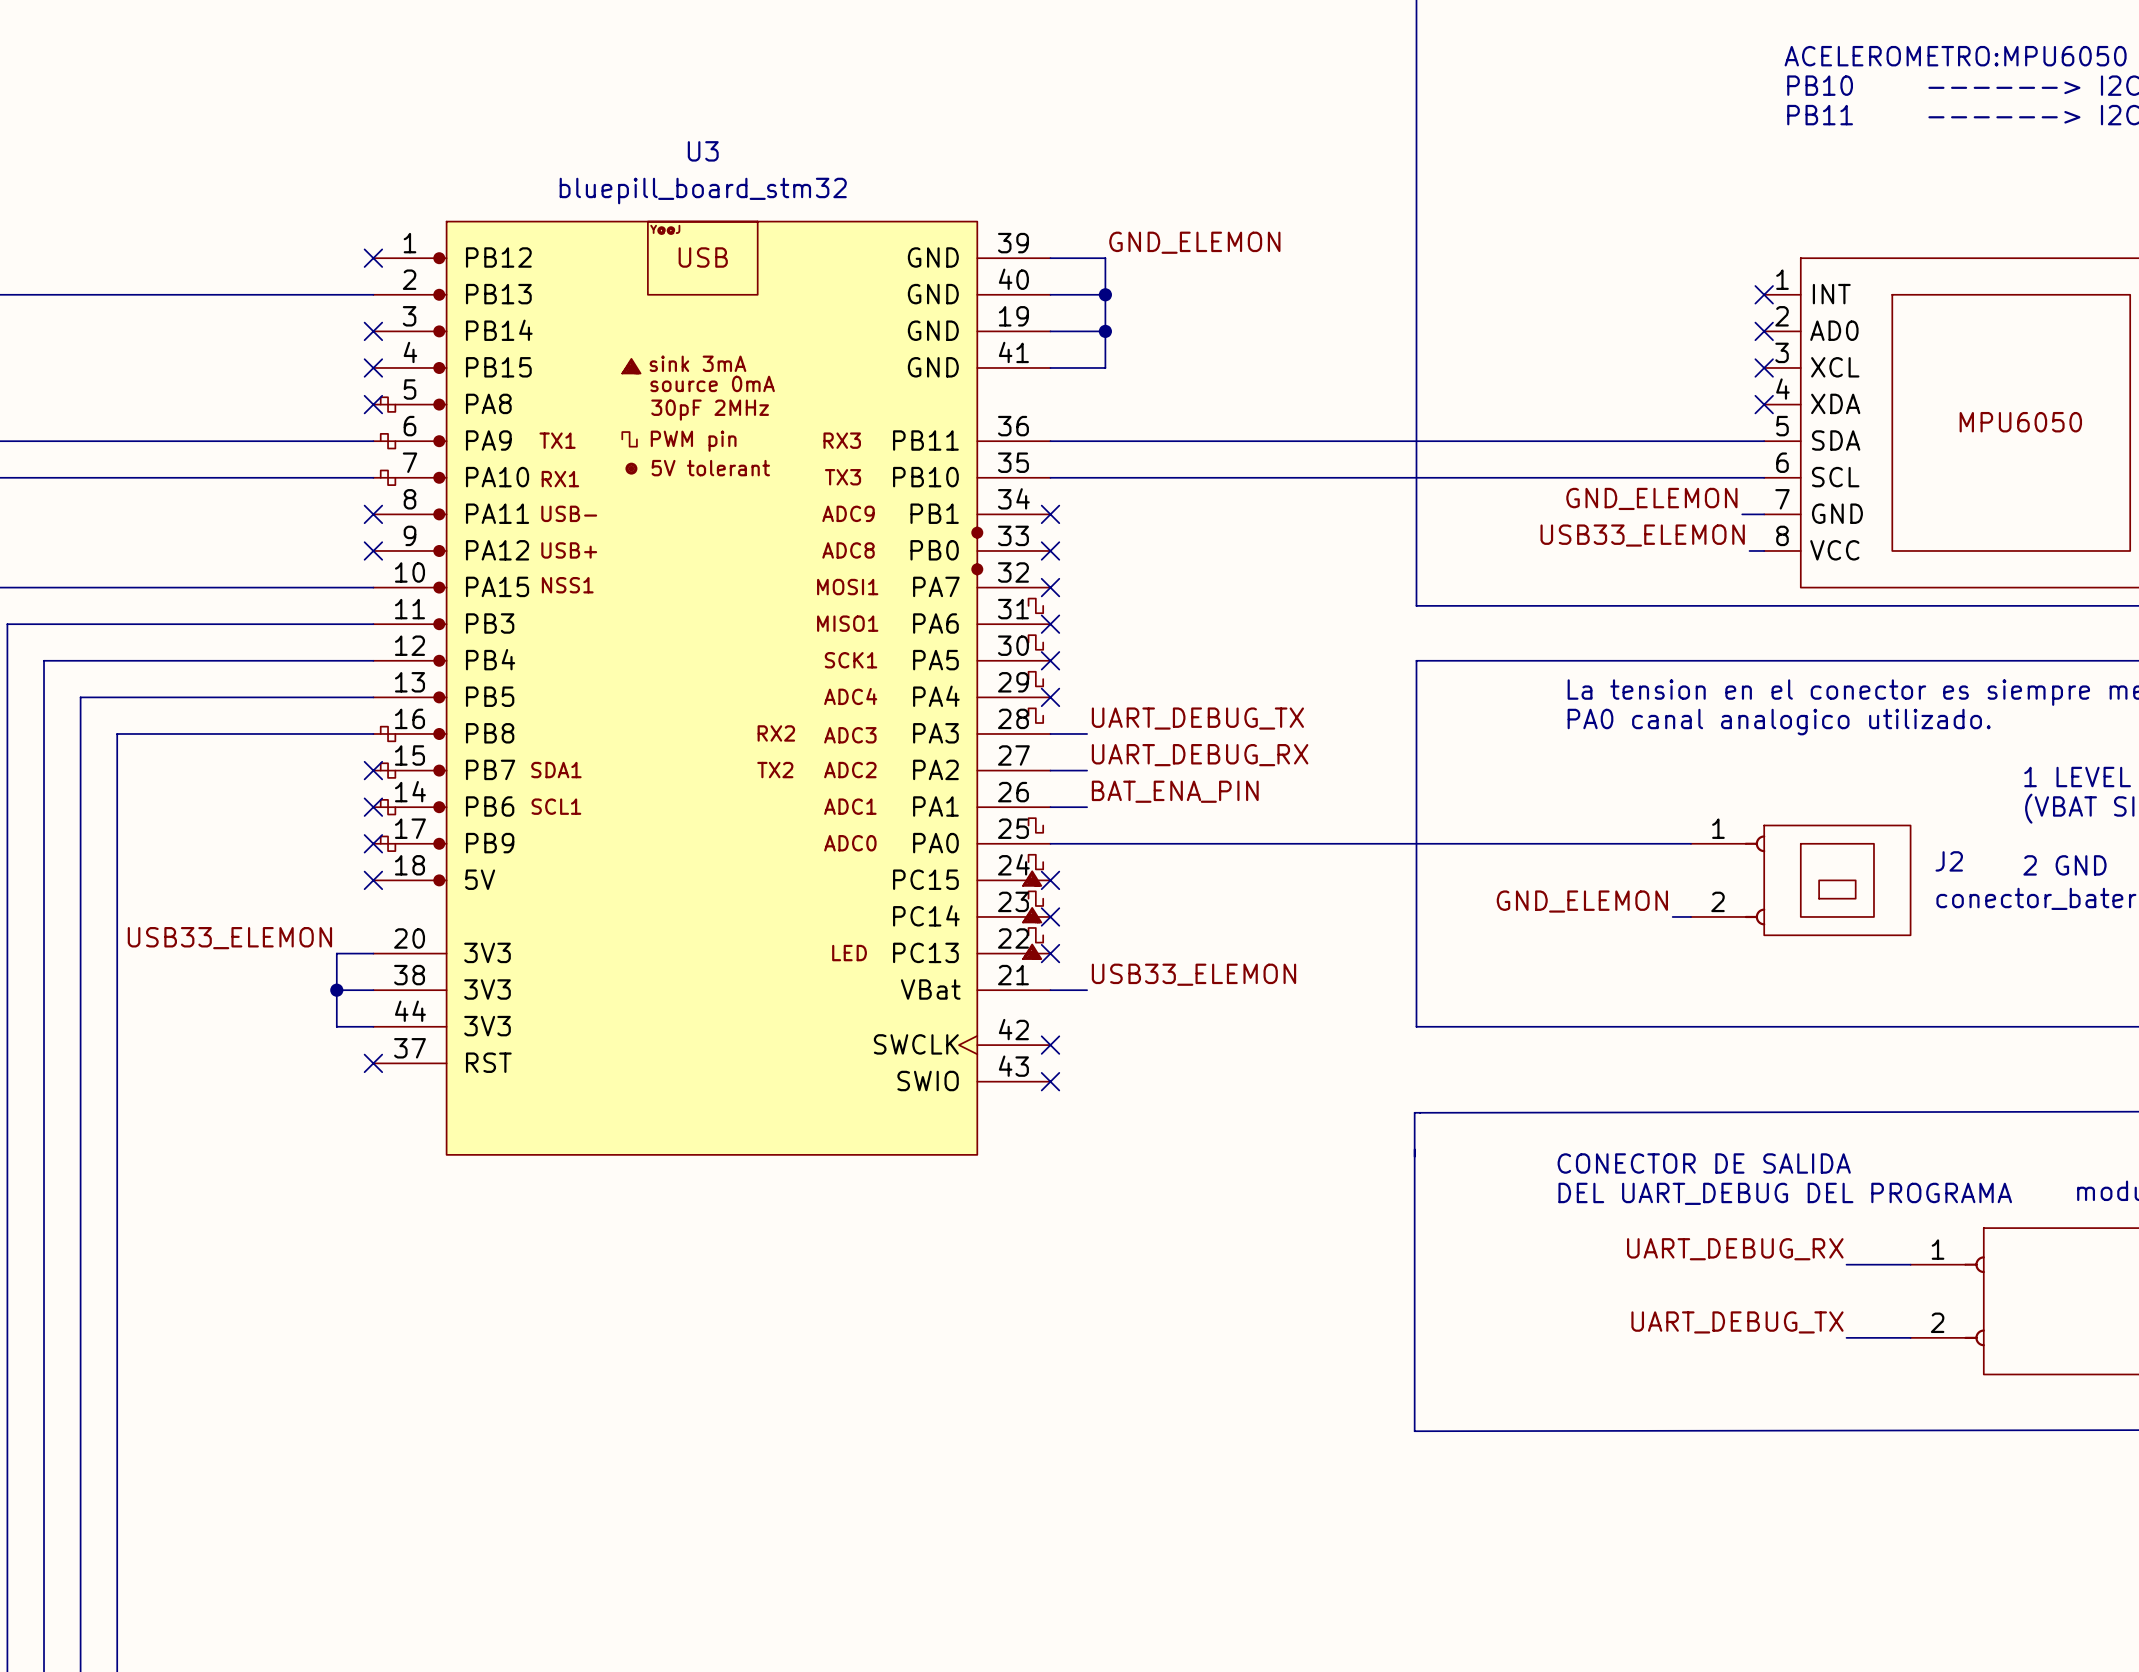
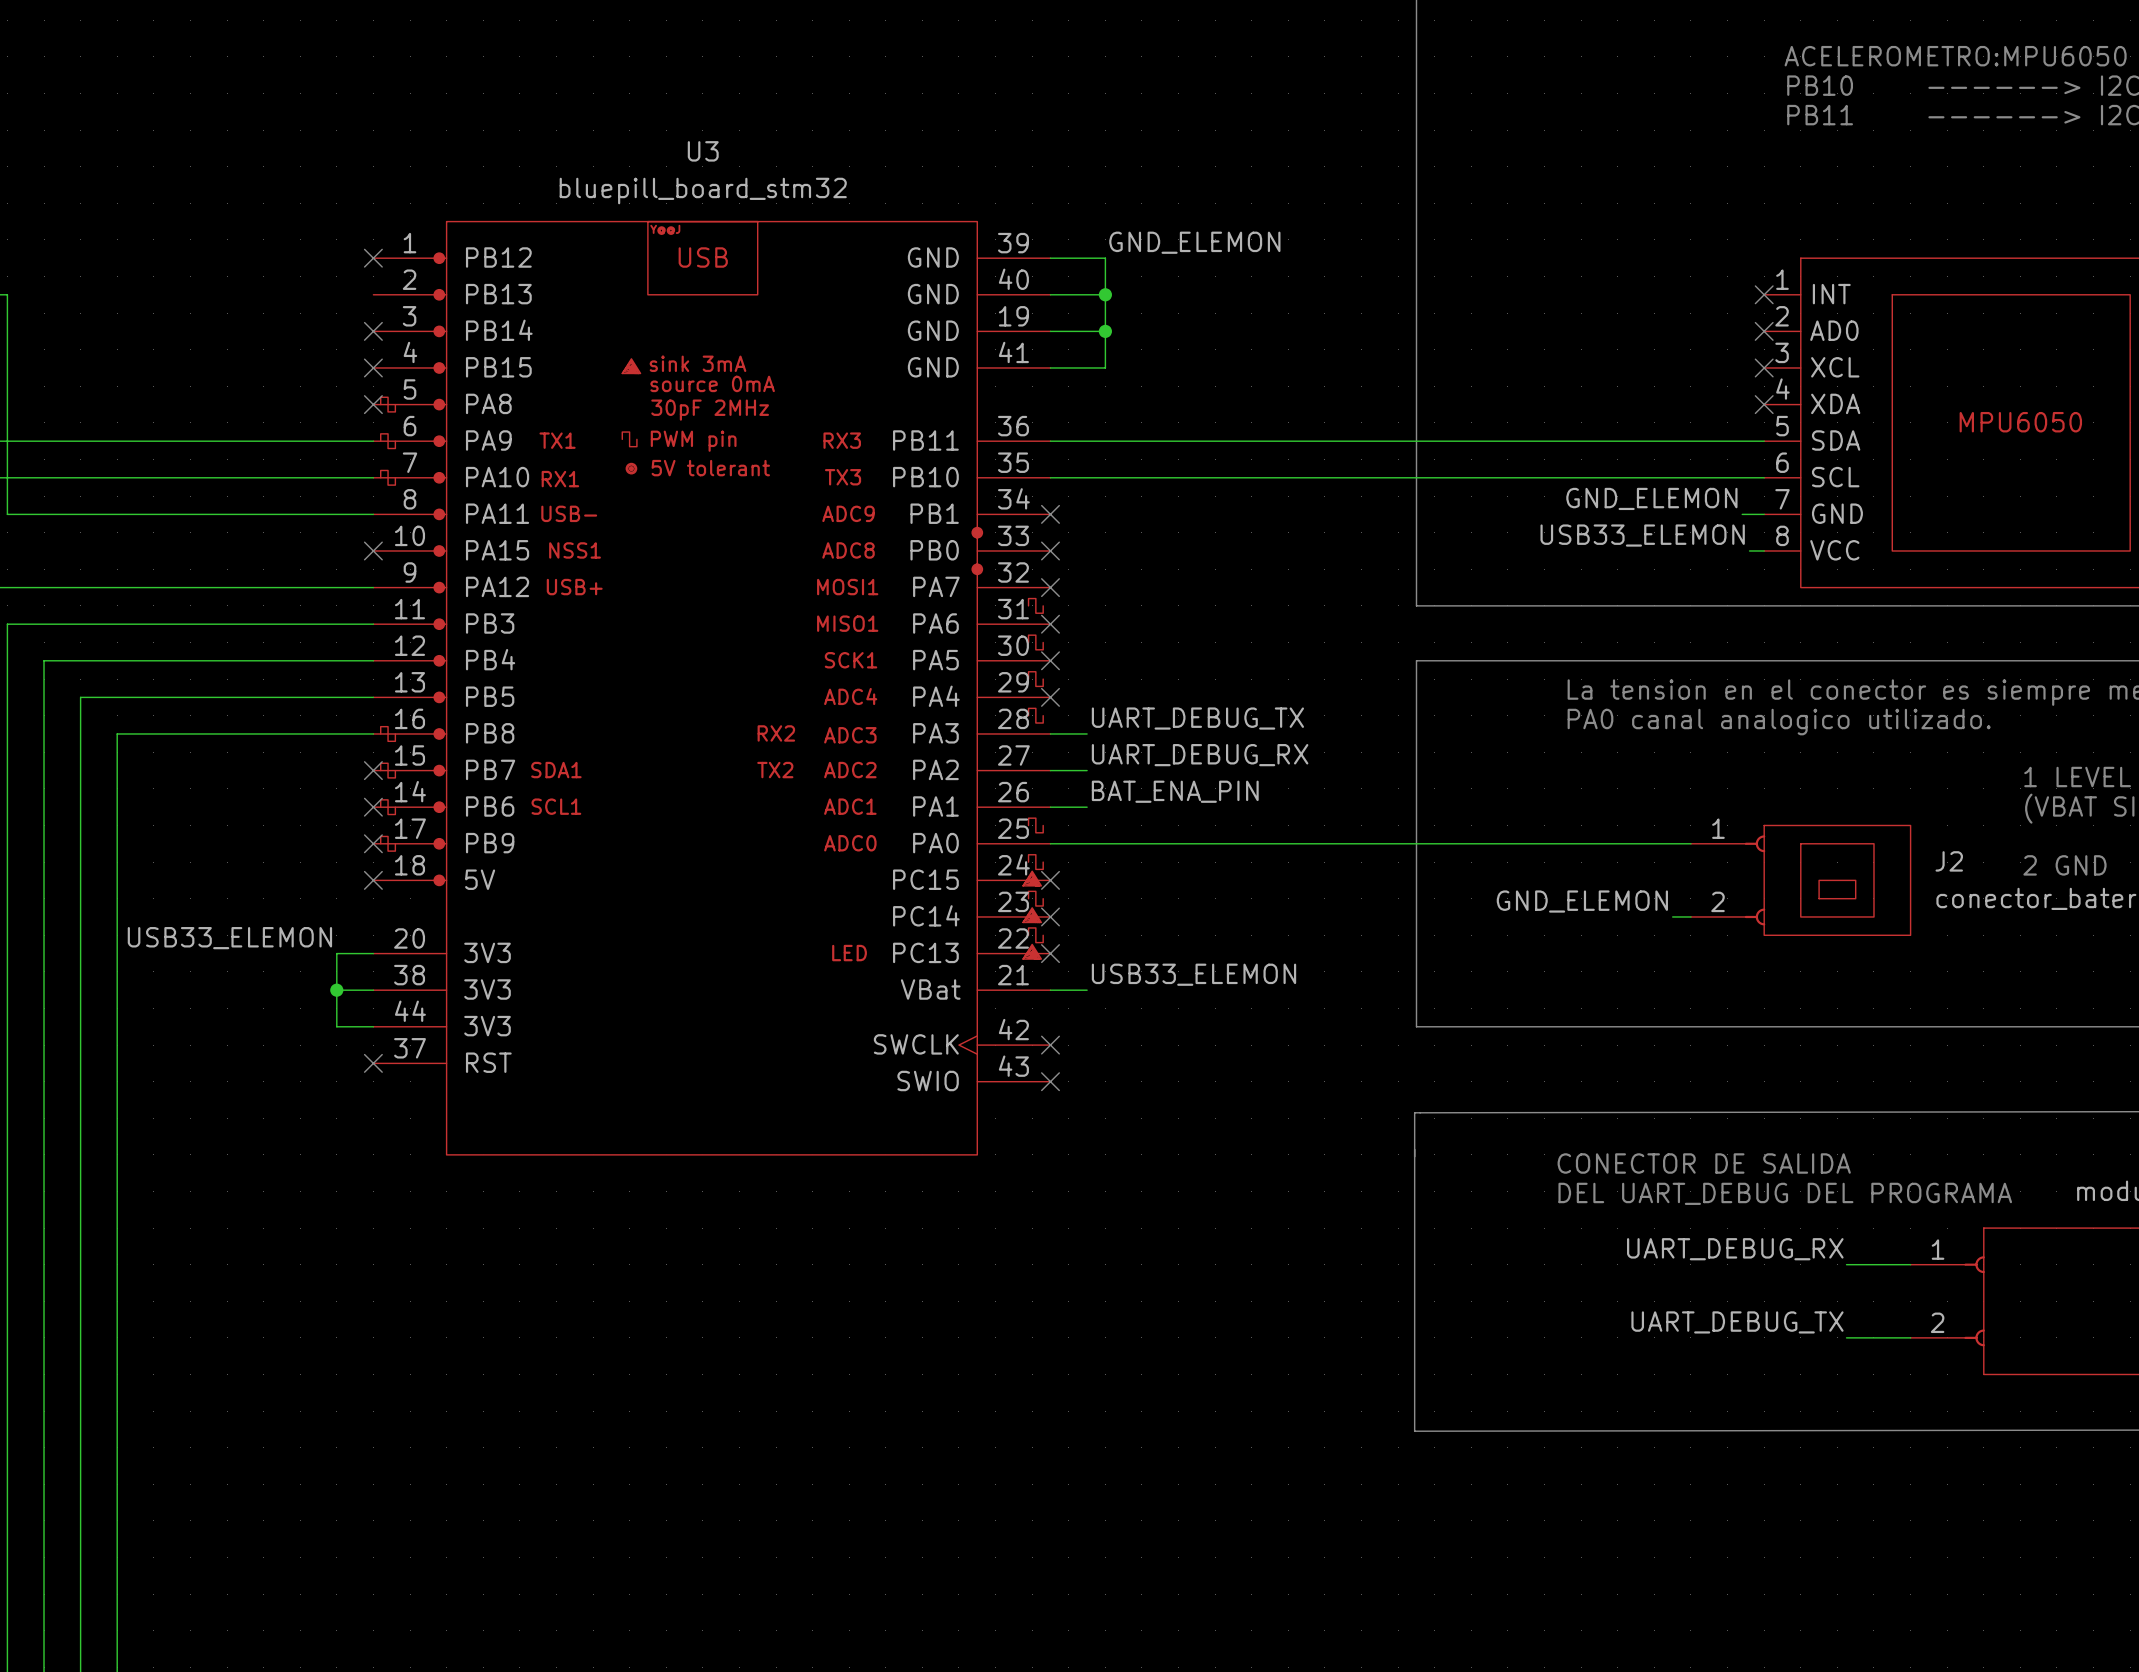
wire: (7, 294) (373, 294) -> (7, 294) (7, 514) (373, 514)
no-connect mark: (373, 514) -> none
U3 pin number: 9 (410, 535) -> 10 (410, 535)
U3 pin name: PA12 (497, 550) -> PA15 (497, 550)
U3 text position: USB+ (569, 550) -> USB+ (574, 587)
U3 pin number: 10 (410, 572) -> 9 (410, 572)
U3 text position: NSS1 (567, 585) -> NSS1 (575, 550)
U3 pin name: PA15 (497, 586) -> PA12 (497, 586)

